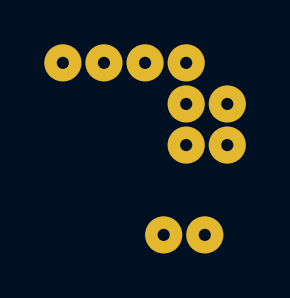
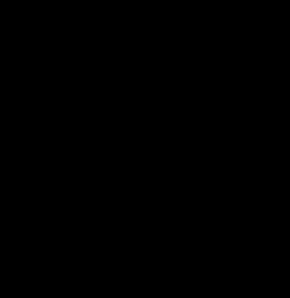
part: (62, 62) -> none
part: (103, 62) -> none
part: (145, 62) -> none
part: (186, 62) -> none
part: (186, 103) -> none
part: (227, 103) -> none
part: (186, 145) -> none
part: (227, 145) -> none
part: (163, 234) -> none
part: (204, 234) -> none

